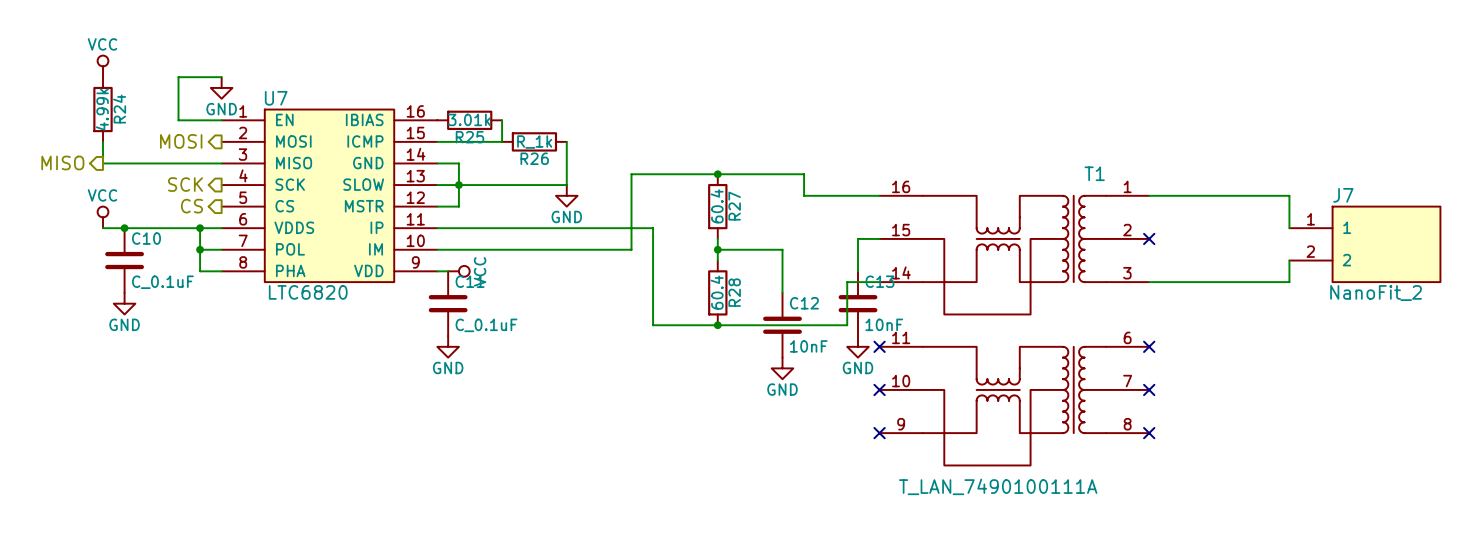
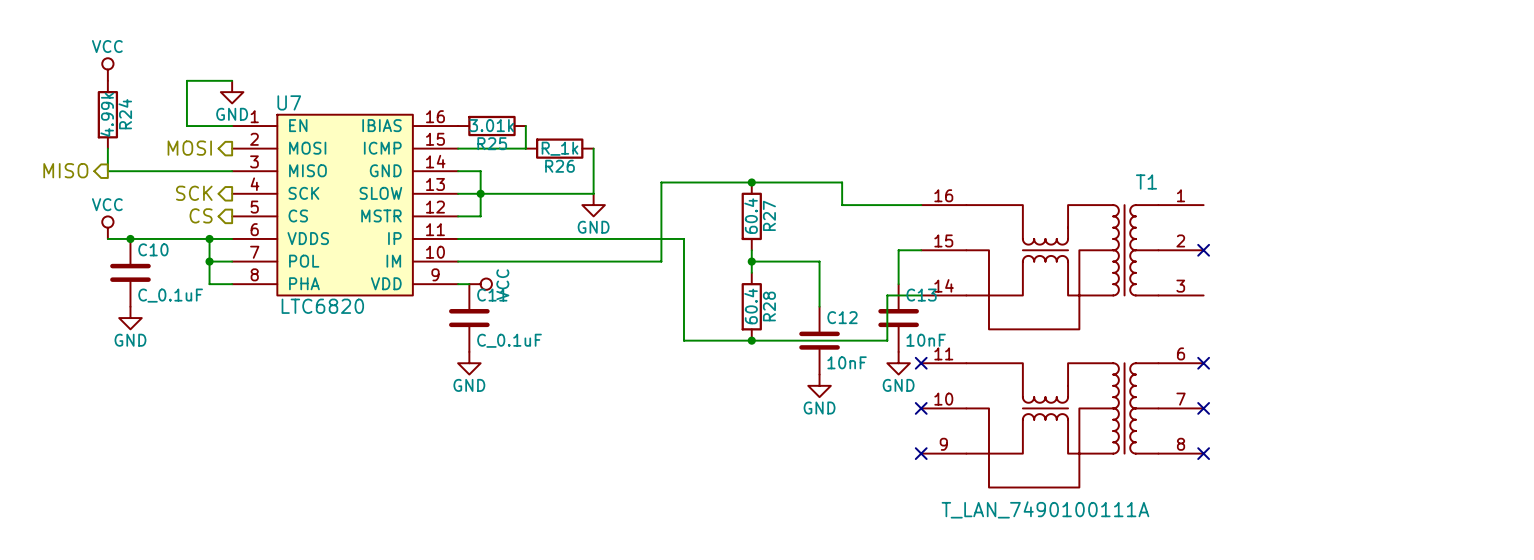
wire: (1149, 195) (1289, 195) (1289, 228) -> none
J7: NanoFit_2 (1364, 244) -> none
wire: (1289, 260) (1289, 282) (1149, 282) -> none

